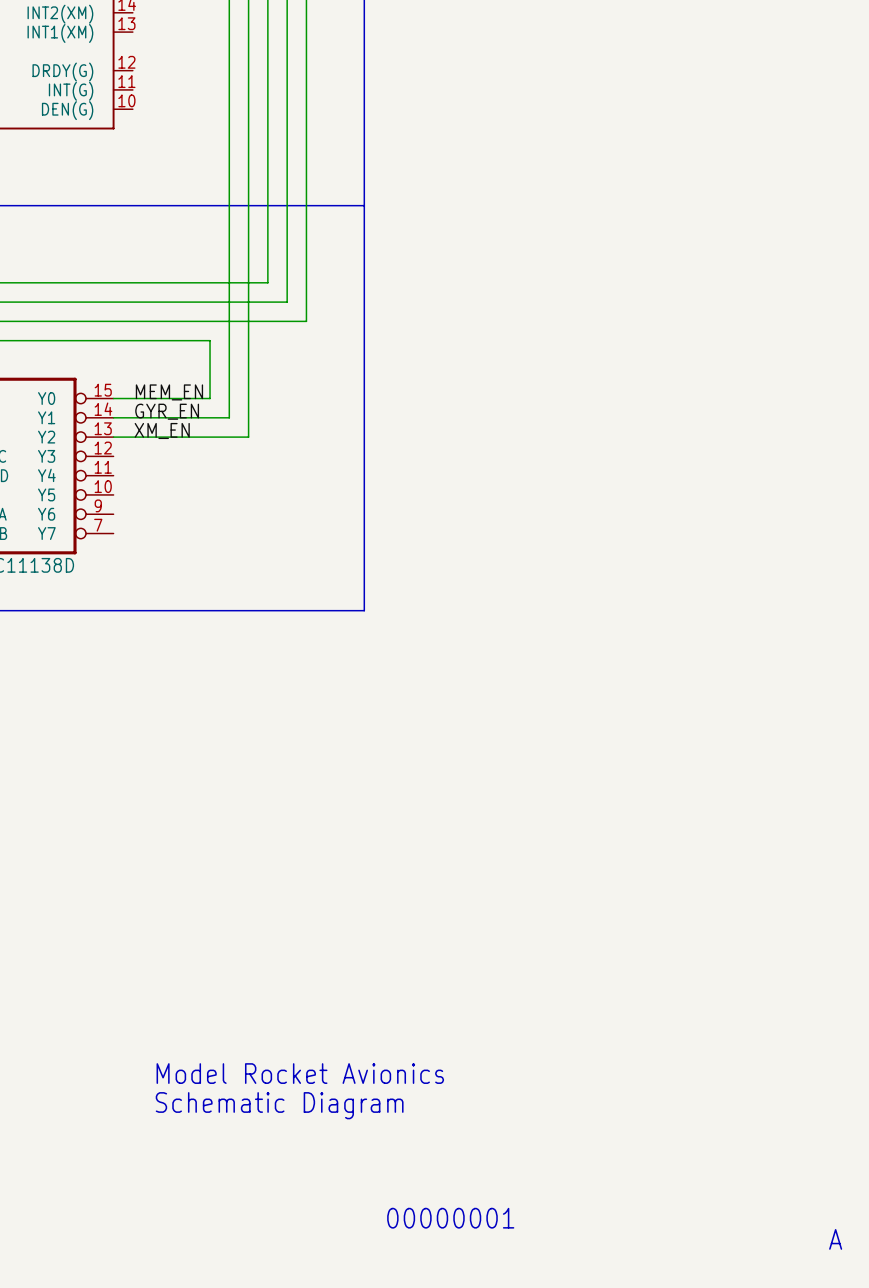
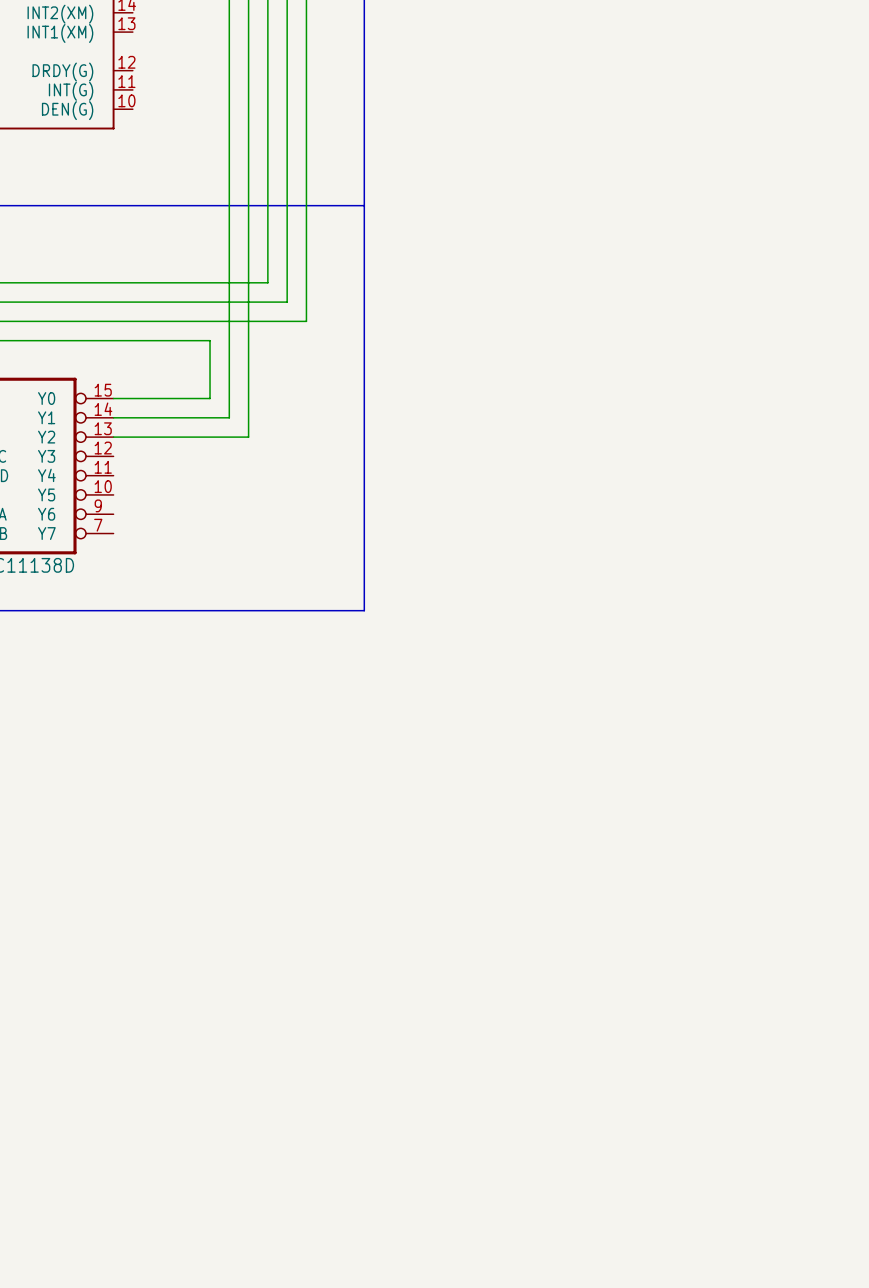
label: MEM_EN (169, 392) -> none
label: GYR_EN (167, 411) -> none
label: XM_EN (162, 430) -> none
text: Model Rocket Avionics (300, 1073) -> none
text: Schematic Diagram (279, 1105) -> none
text: 00000001 (450, 1218) -> none
text: A (835, 1239) -> none

